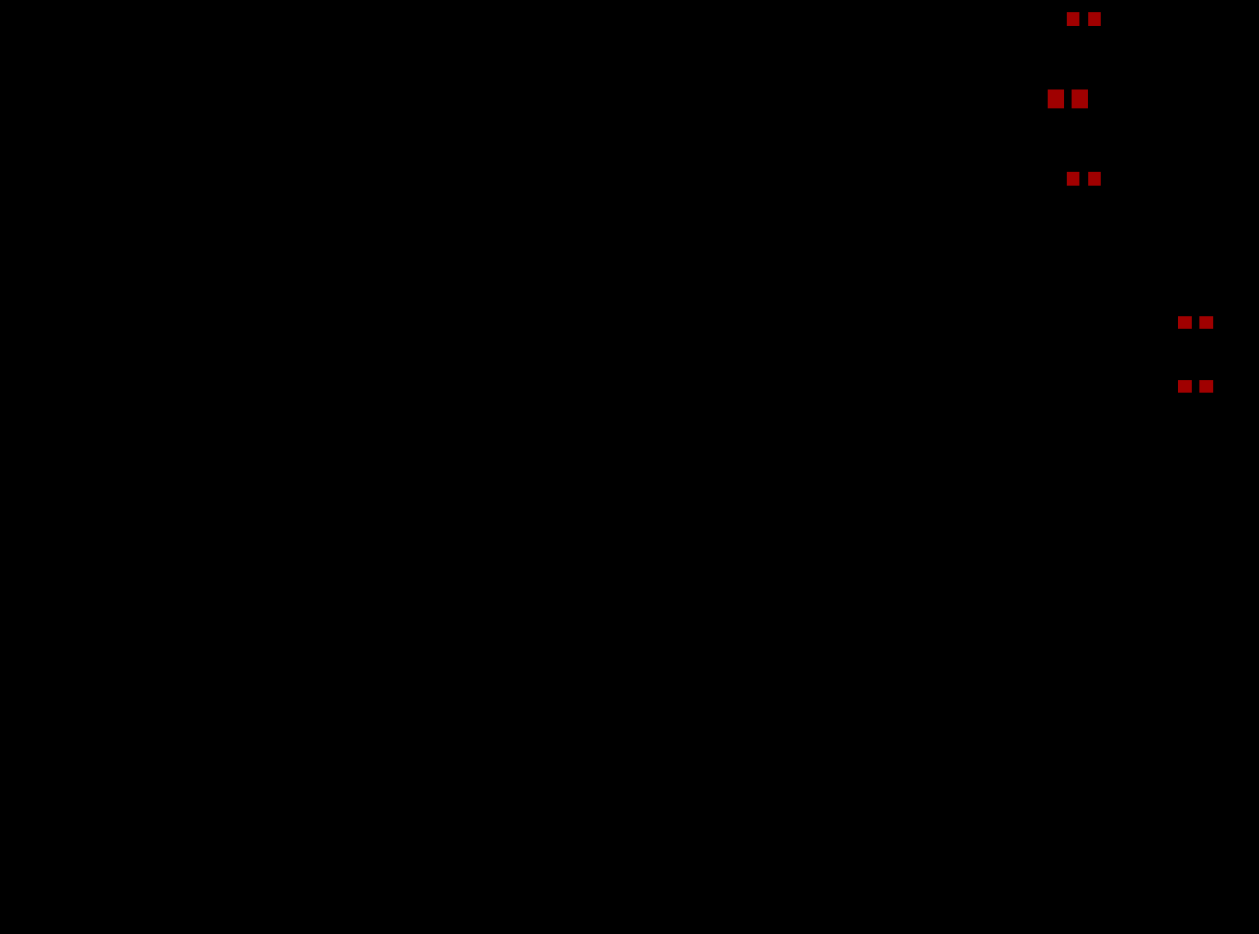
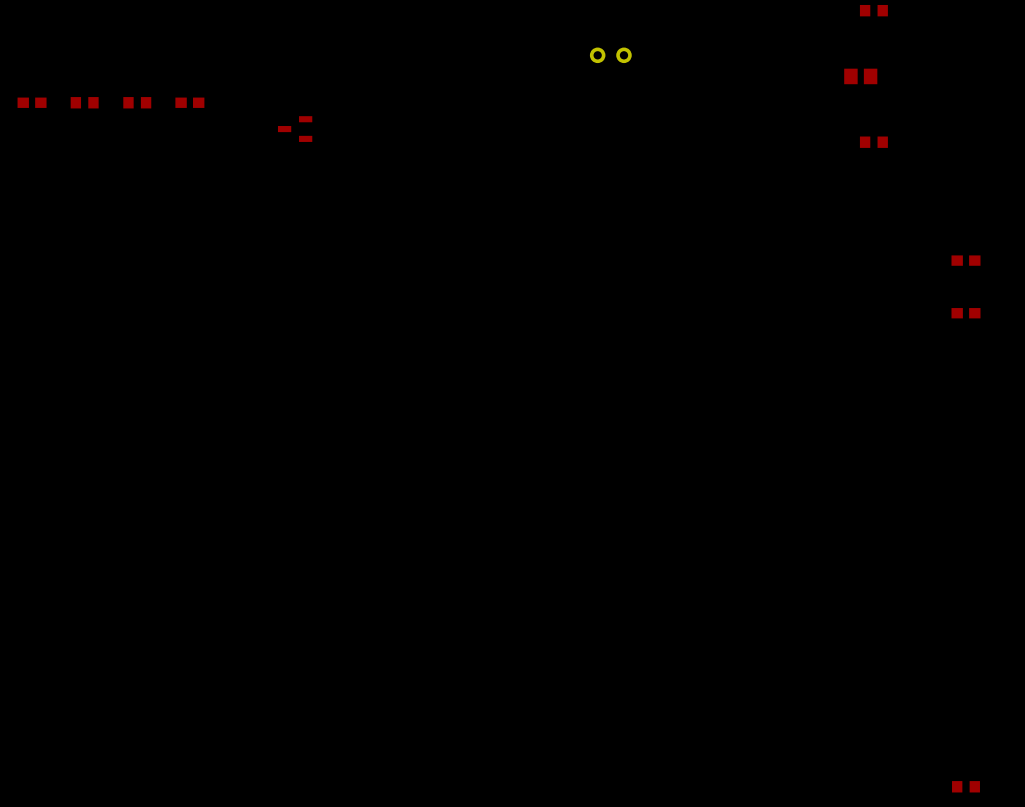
part: none -> (610, 55)
part: none -> (32, 102)
part: none -> (84, 102)
part: none -> (137, 102)
part: none -> (189, 102)
part: none -> (295, 129)

